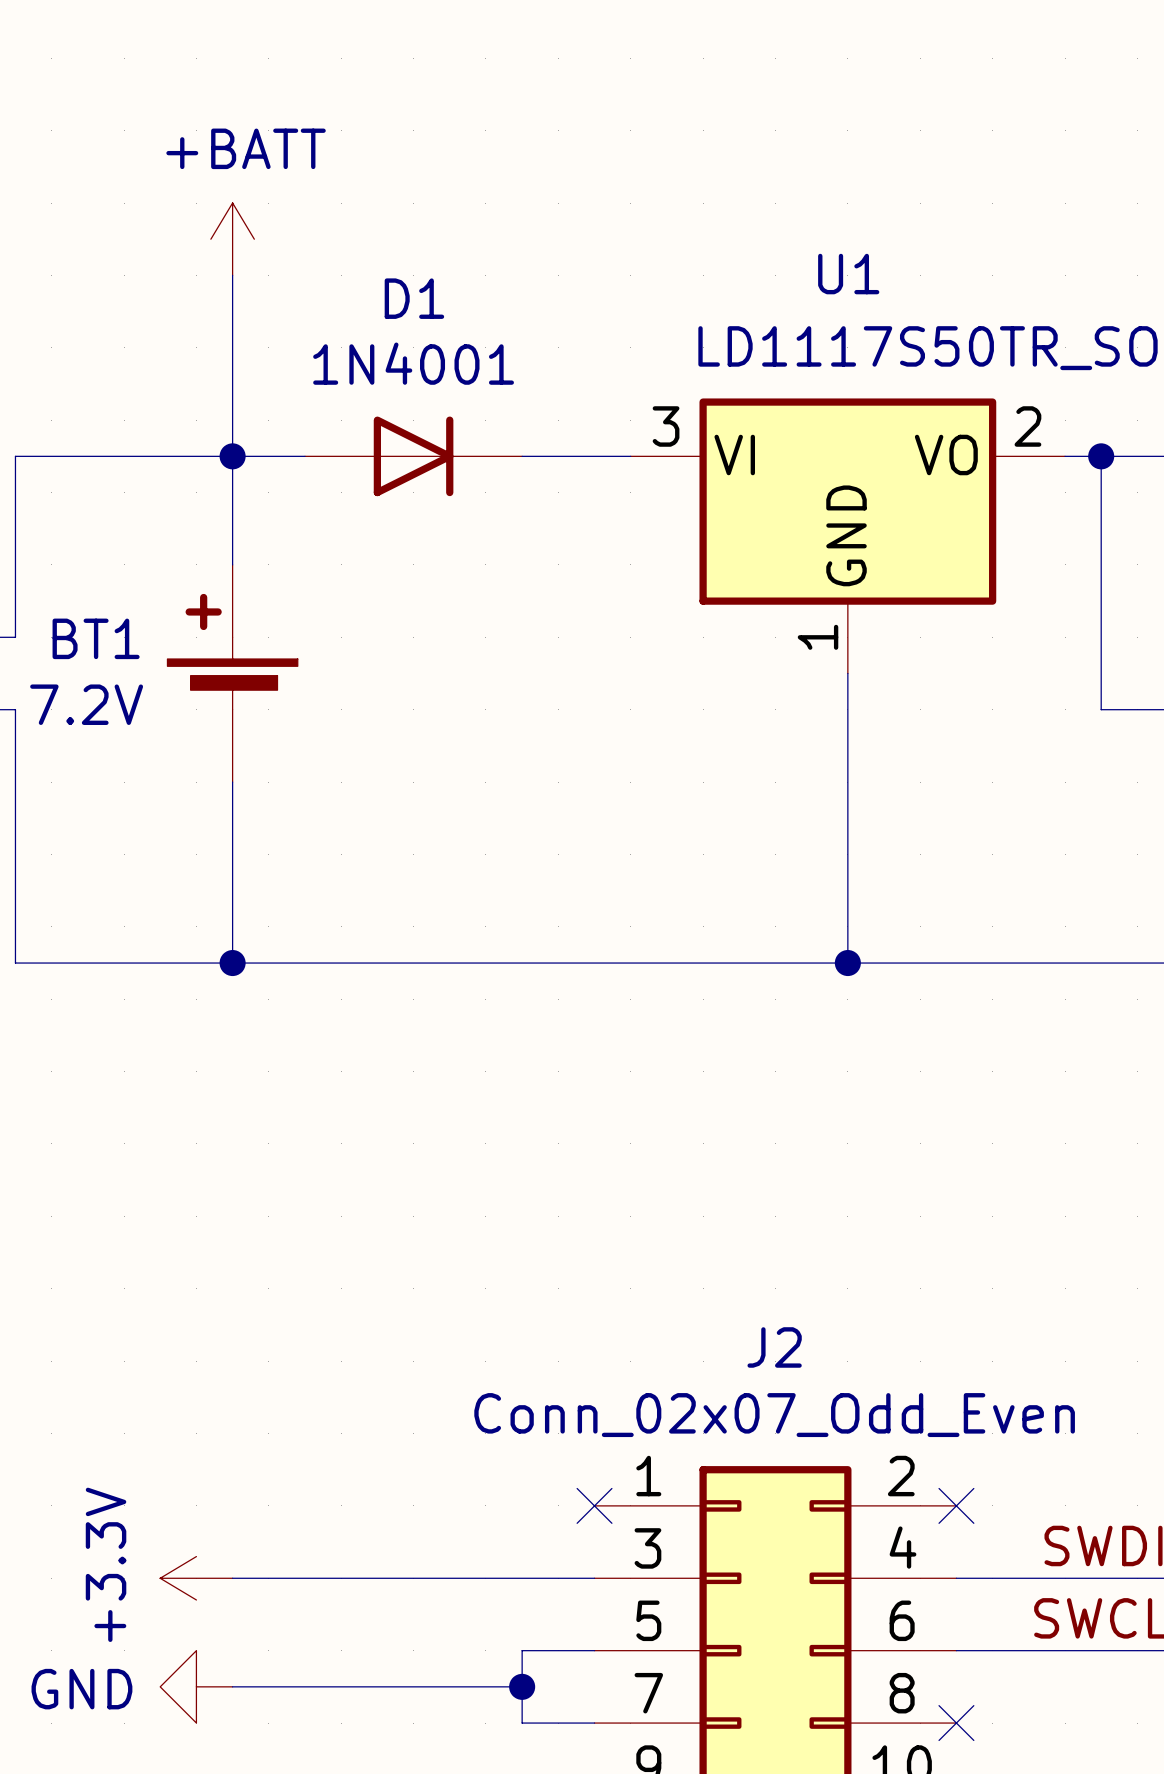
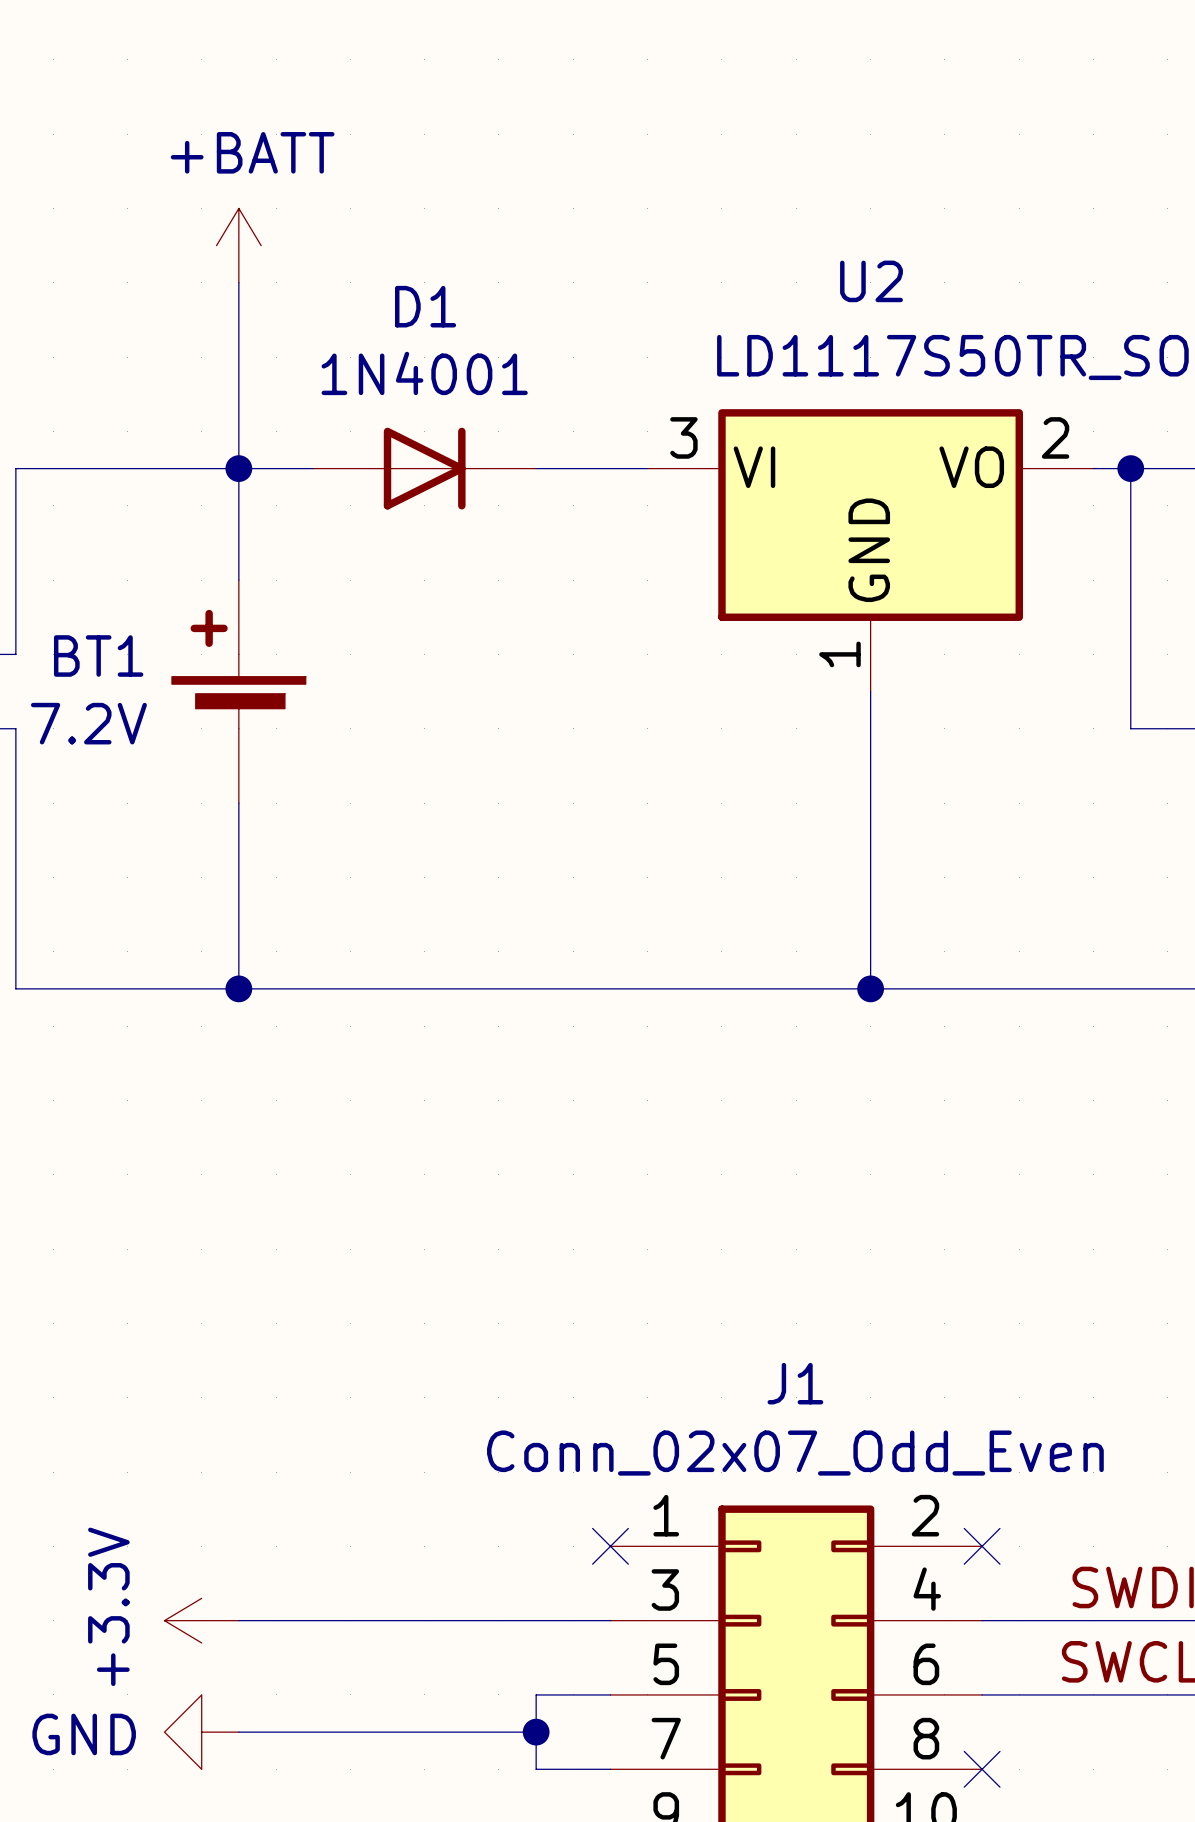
U1 name: U1 (848, 274) -> U2 (871, 281)
J2 name: J2 (774, 1347) -> J1 (795, 1383)

